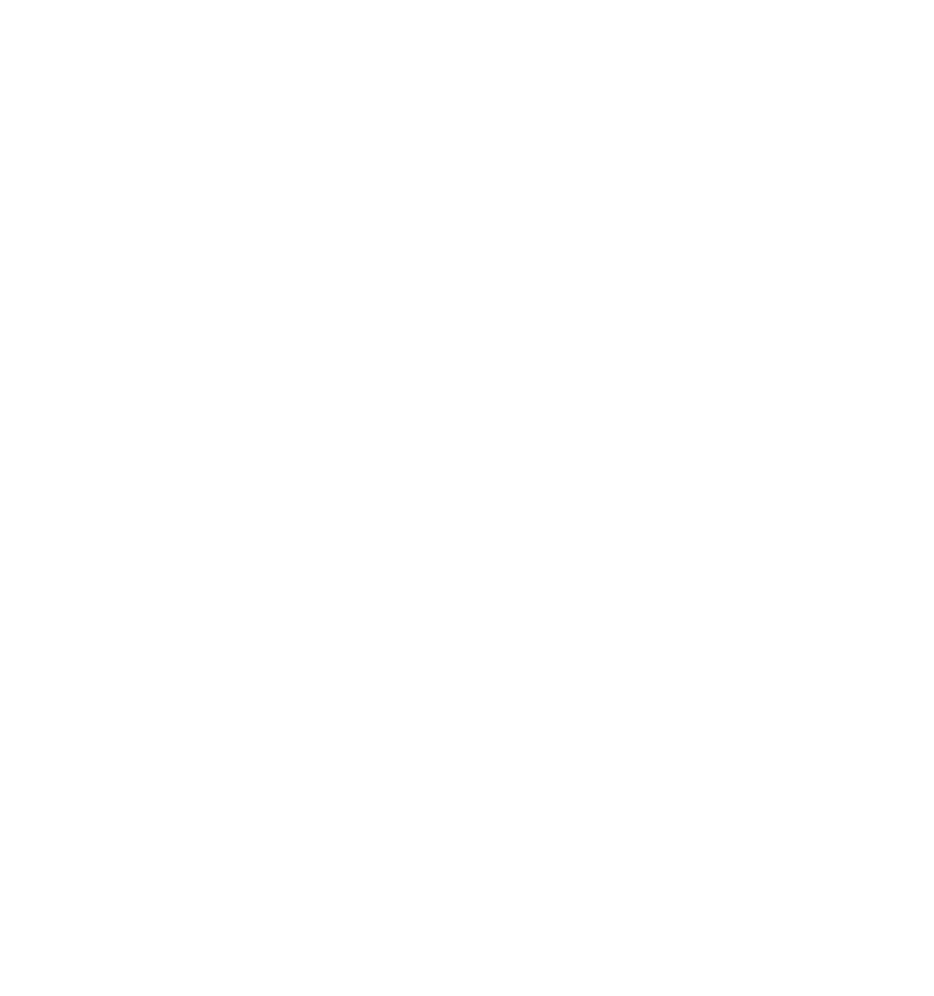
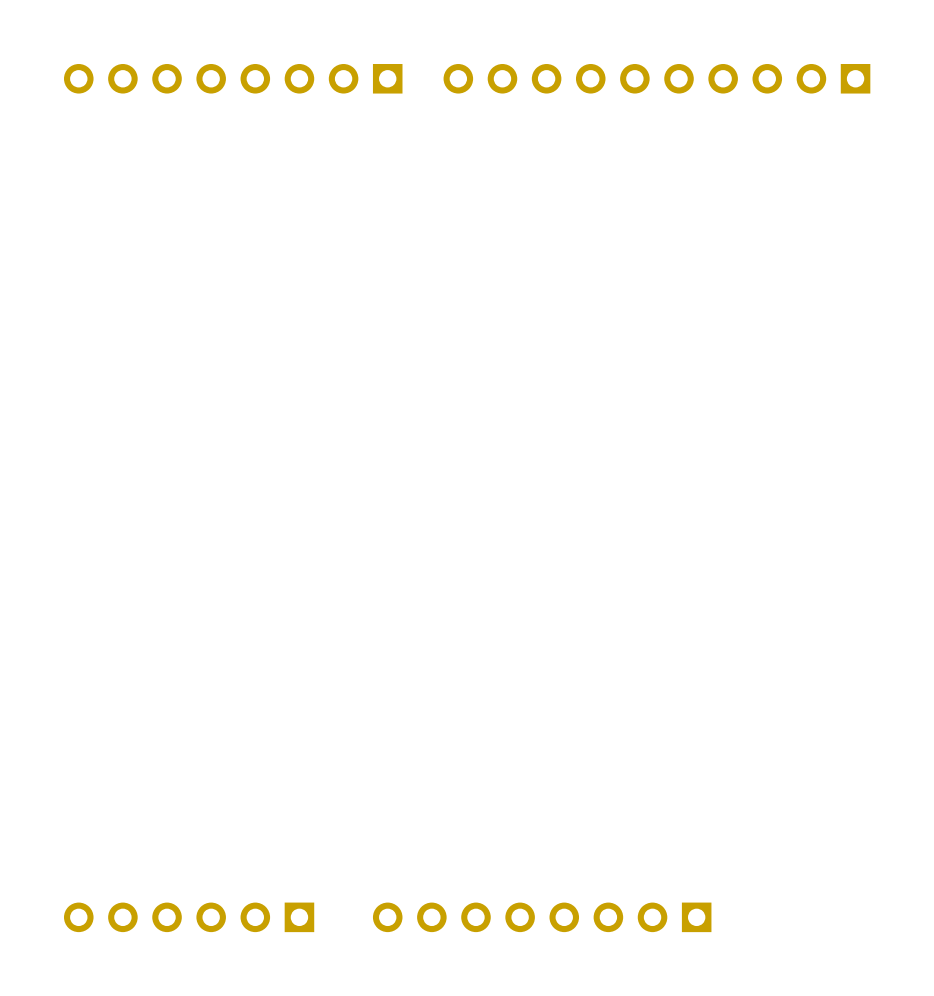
part: none -> (233, 78)
part: none -> (656, 78)
part: none -> (189, 917)
part: none -> (542, 917)

